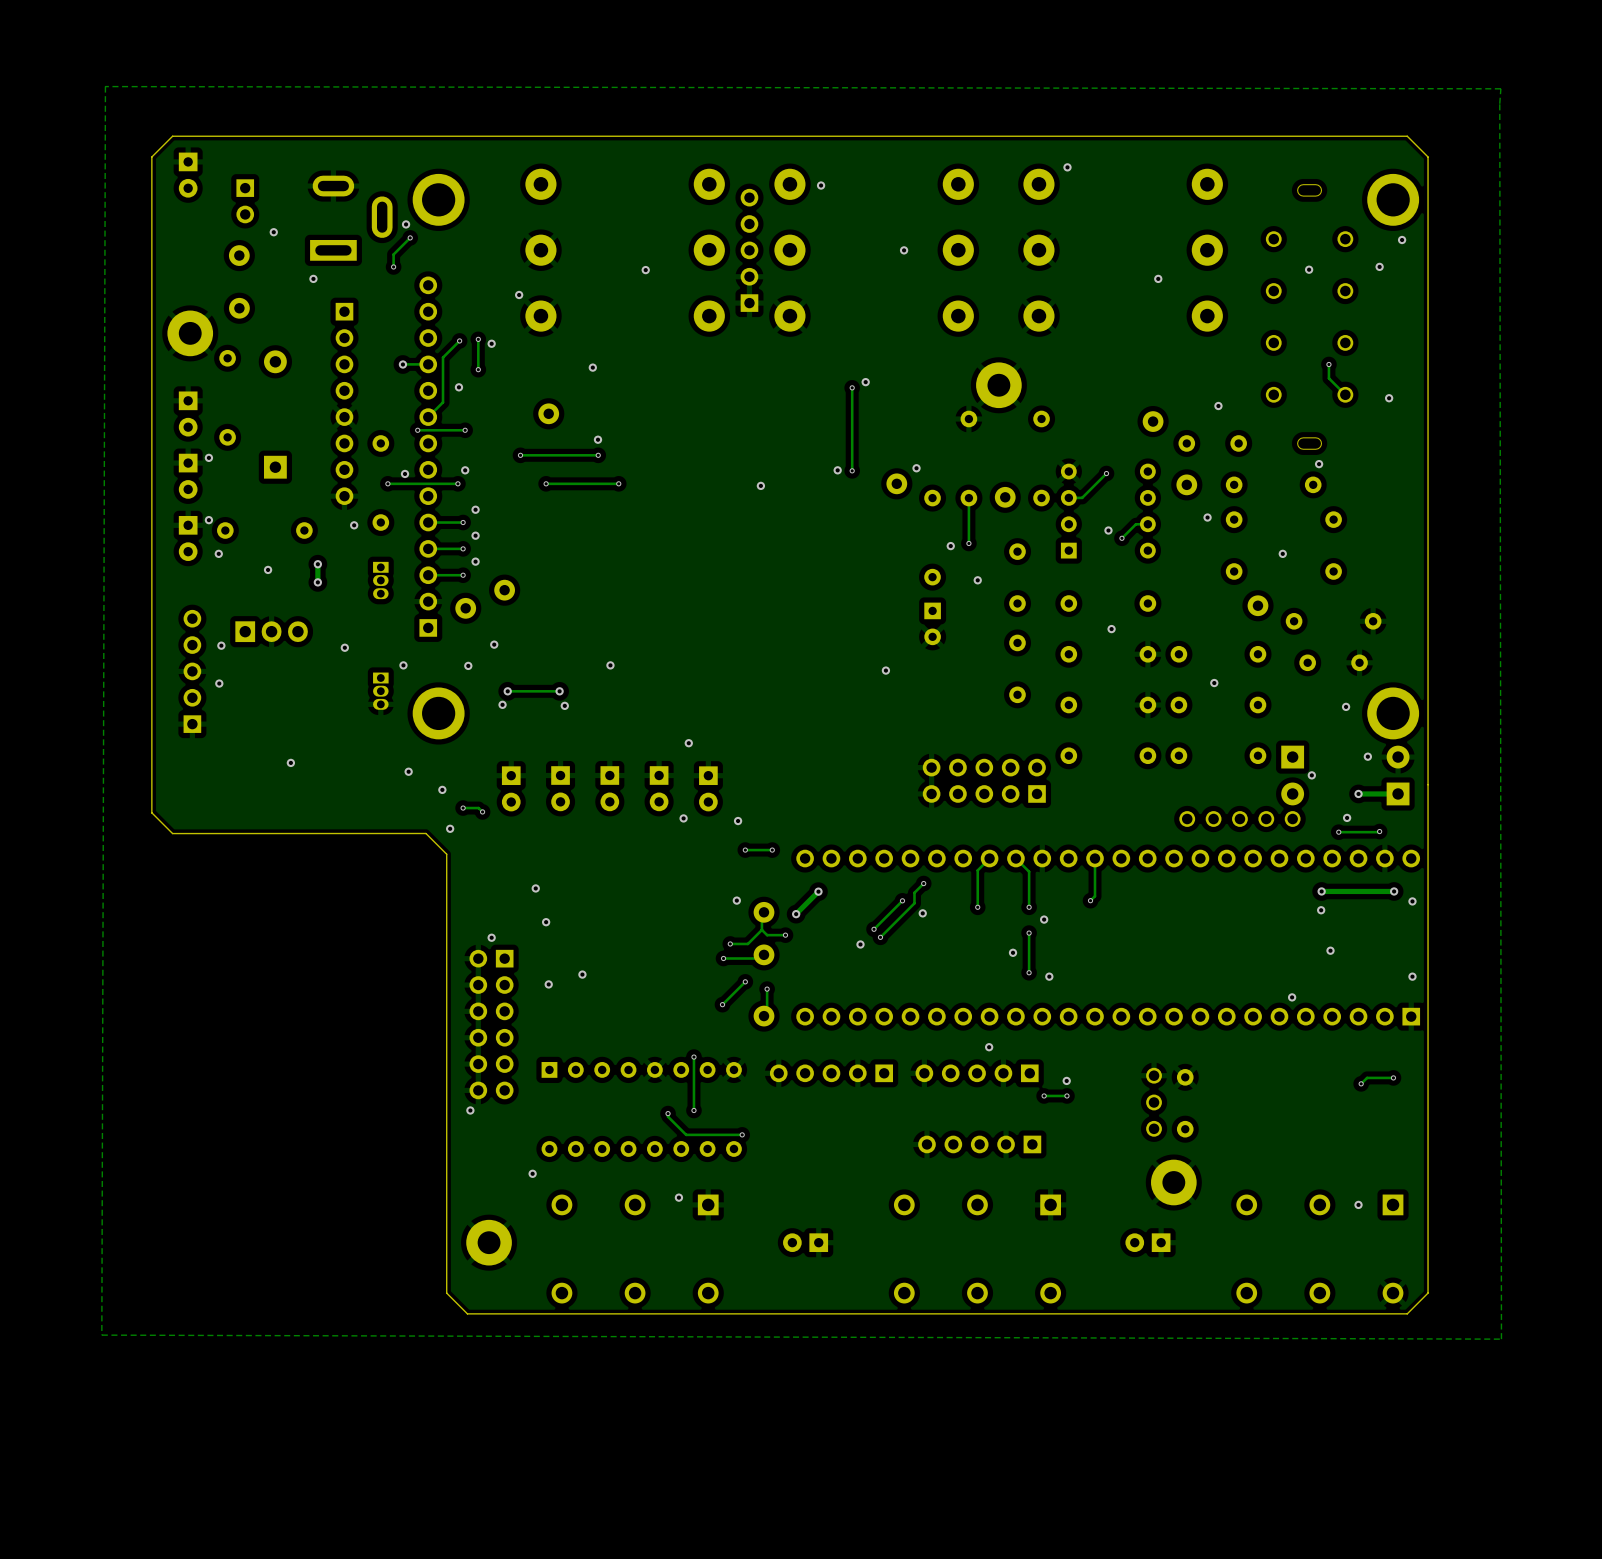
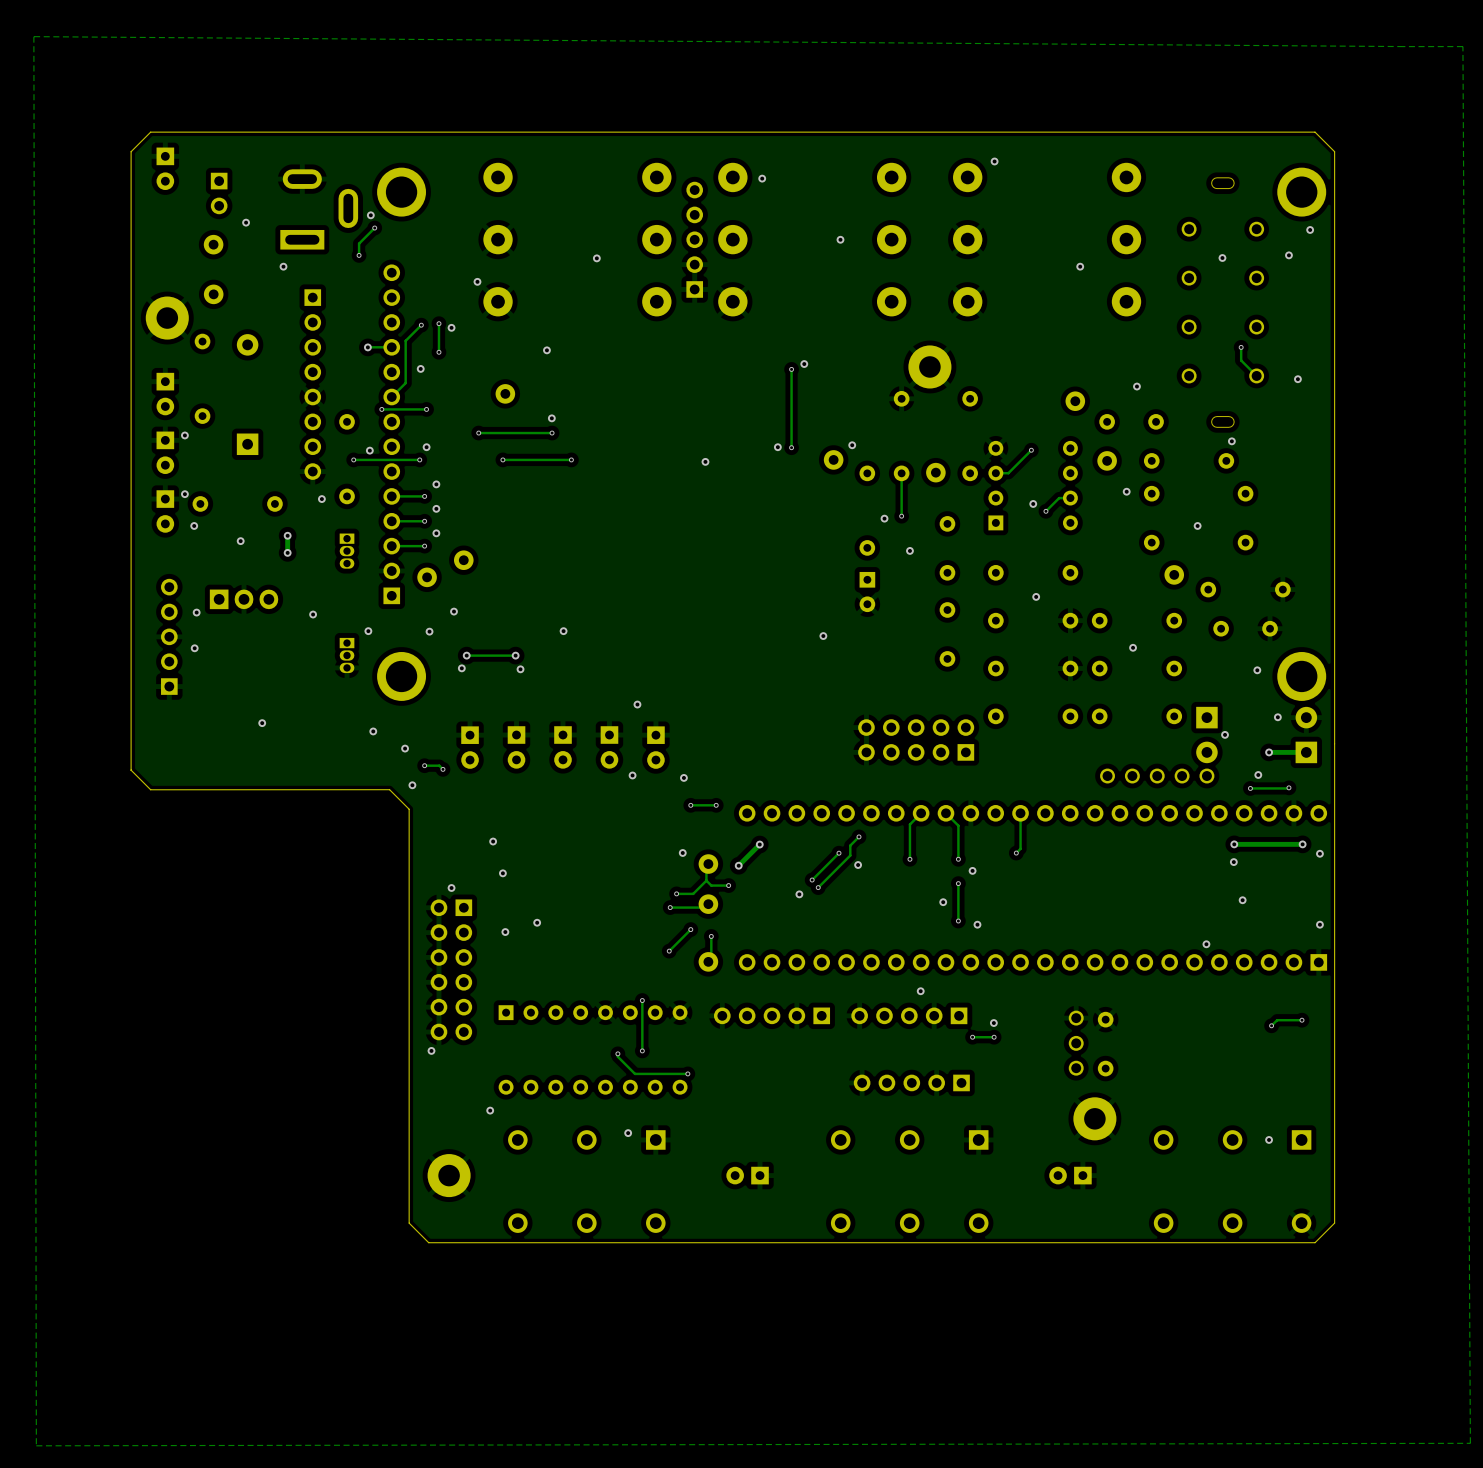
zone outline: (105, 86) (1500, 88) (1501, 1339) (101, 1335) (105, 86) -> (33, 36) (1462, 46) (1470, 1443) (36, 1445) (33, 36)

